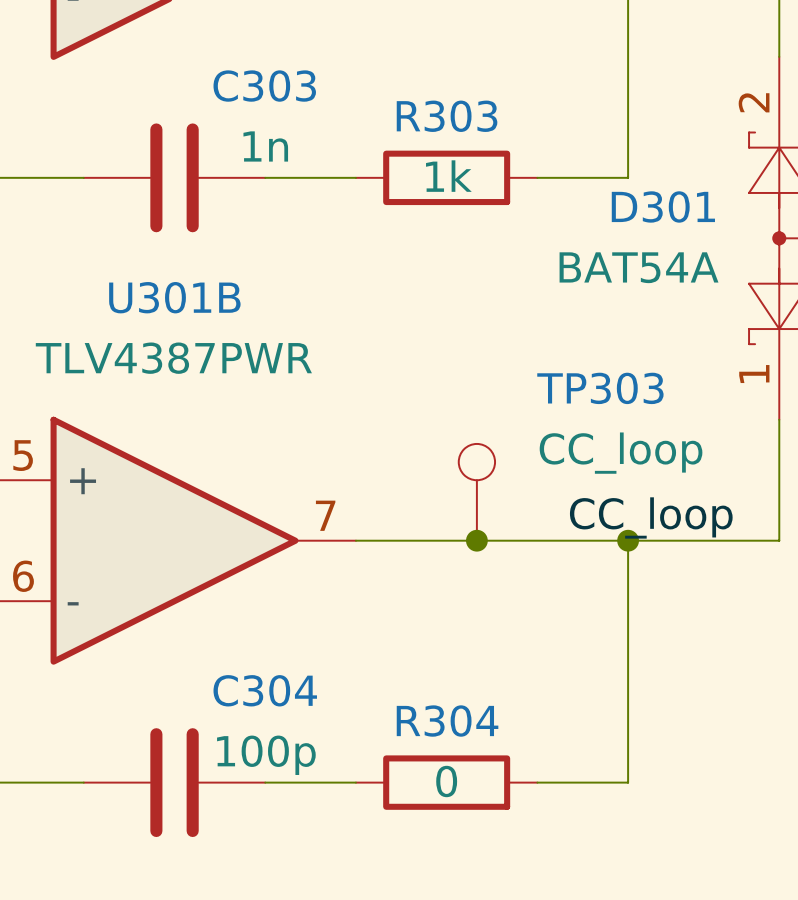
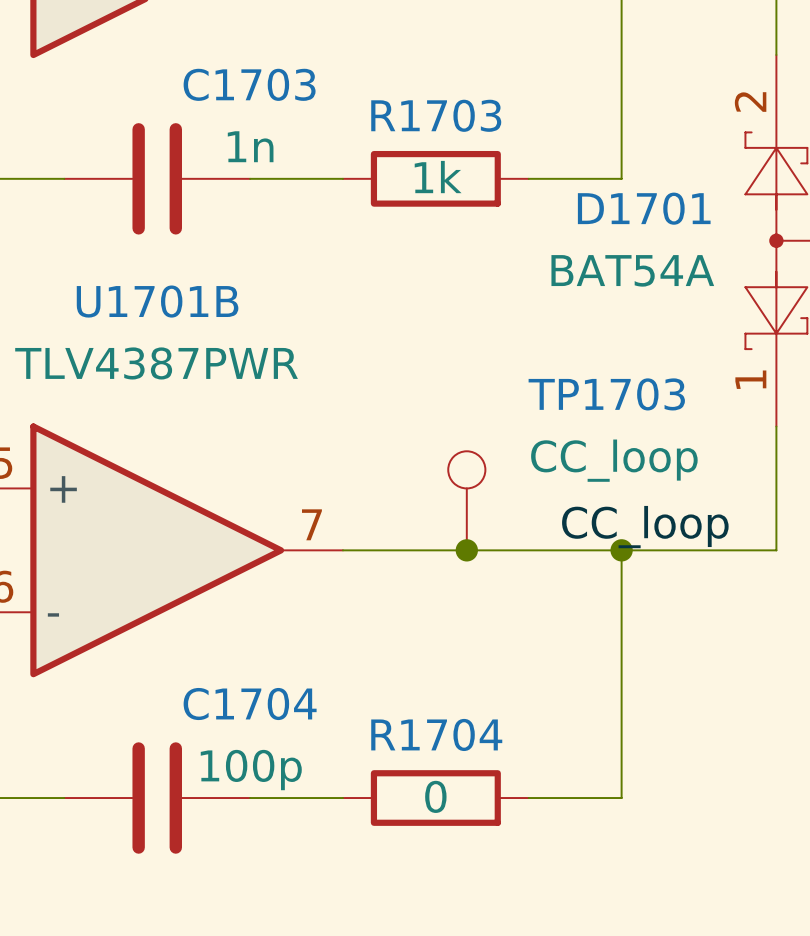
C303 name: C303 (264, 86) -> C1703 (249, 84)
R303 name: R303 (447, 116) -> R1703 (436, 115)
D301 name: D301 (663, 206) -> D1701 (644, 208)
U301B name: U301B (174, 297) -> U1701B (157, 301)
TP303 name: TP303 (600, 388) -> TP1703 (606, 394)
C304 name: C304 (265, 690) -> C1704 (250, 704)
R304 name: R304 (447, 721) -> R1704 (436, 734)

